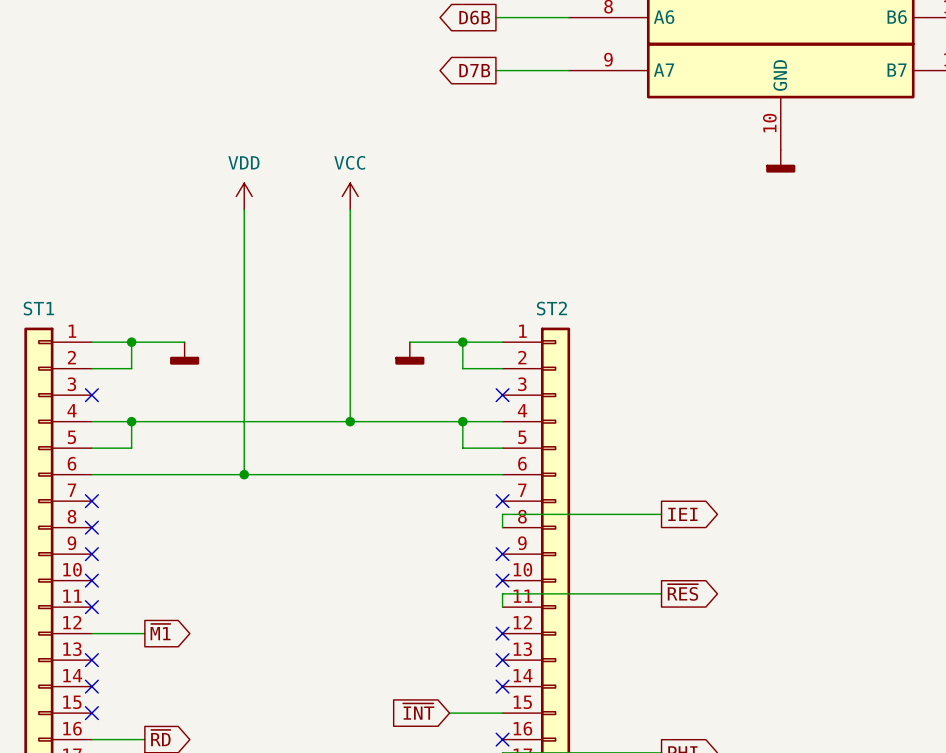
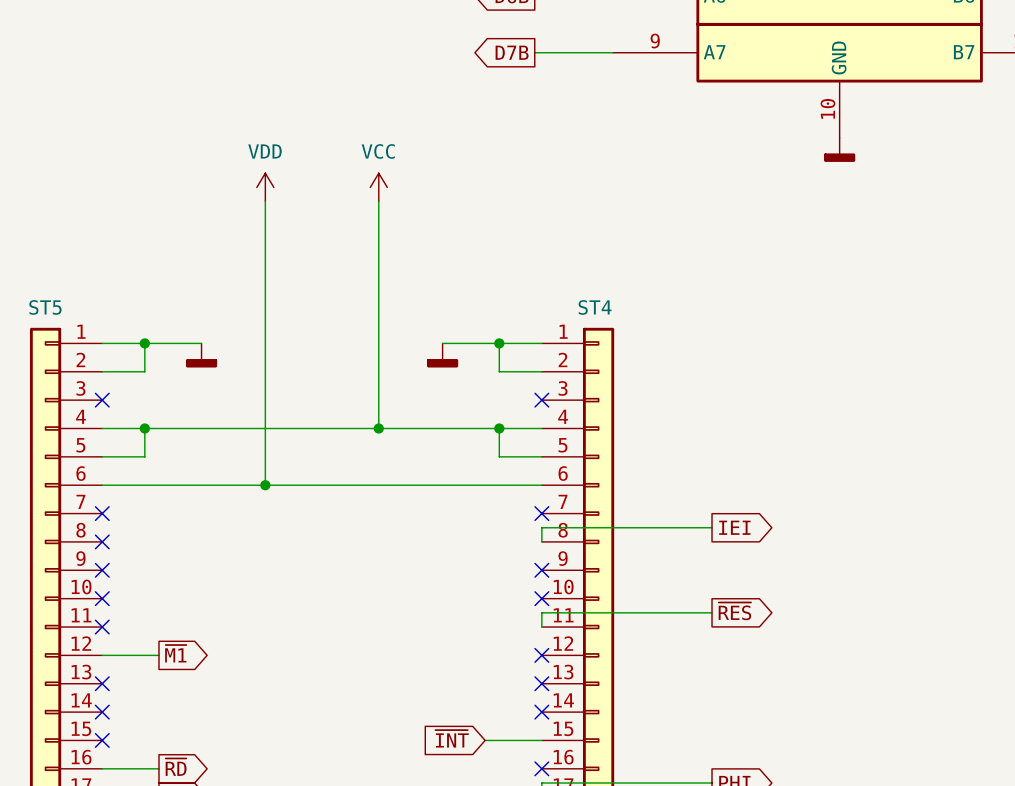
ST1 name: ST1 (38, 308) -> ST5 (45, 307)
ST2 name: ST2 (551, 308) -> ST4 (595, 307)

